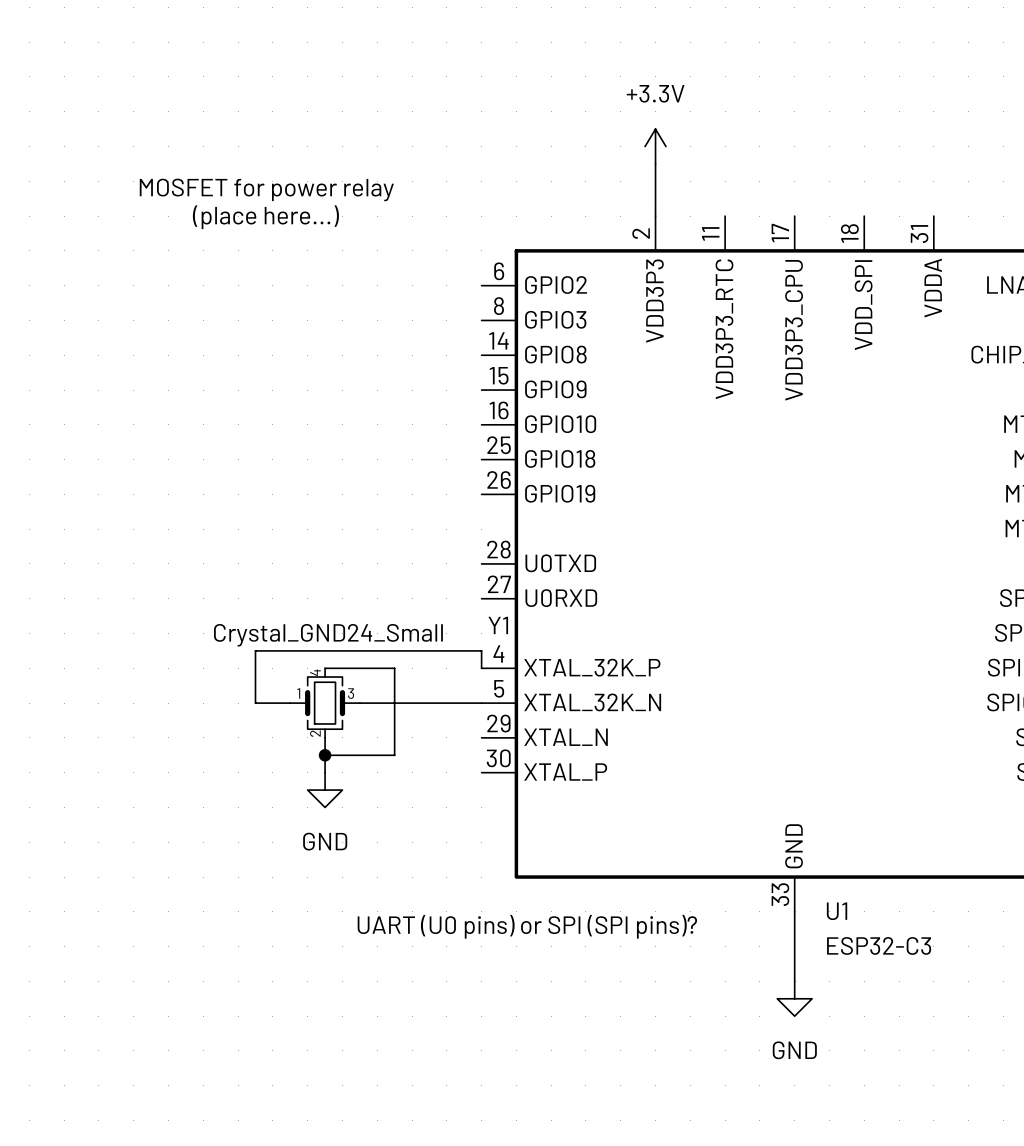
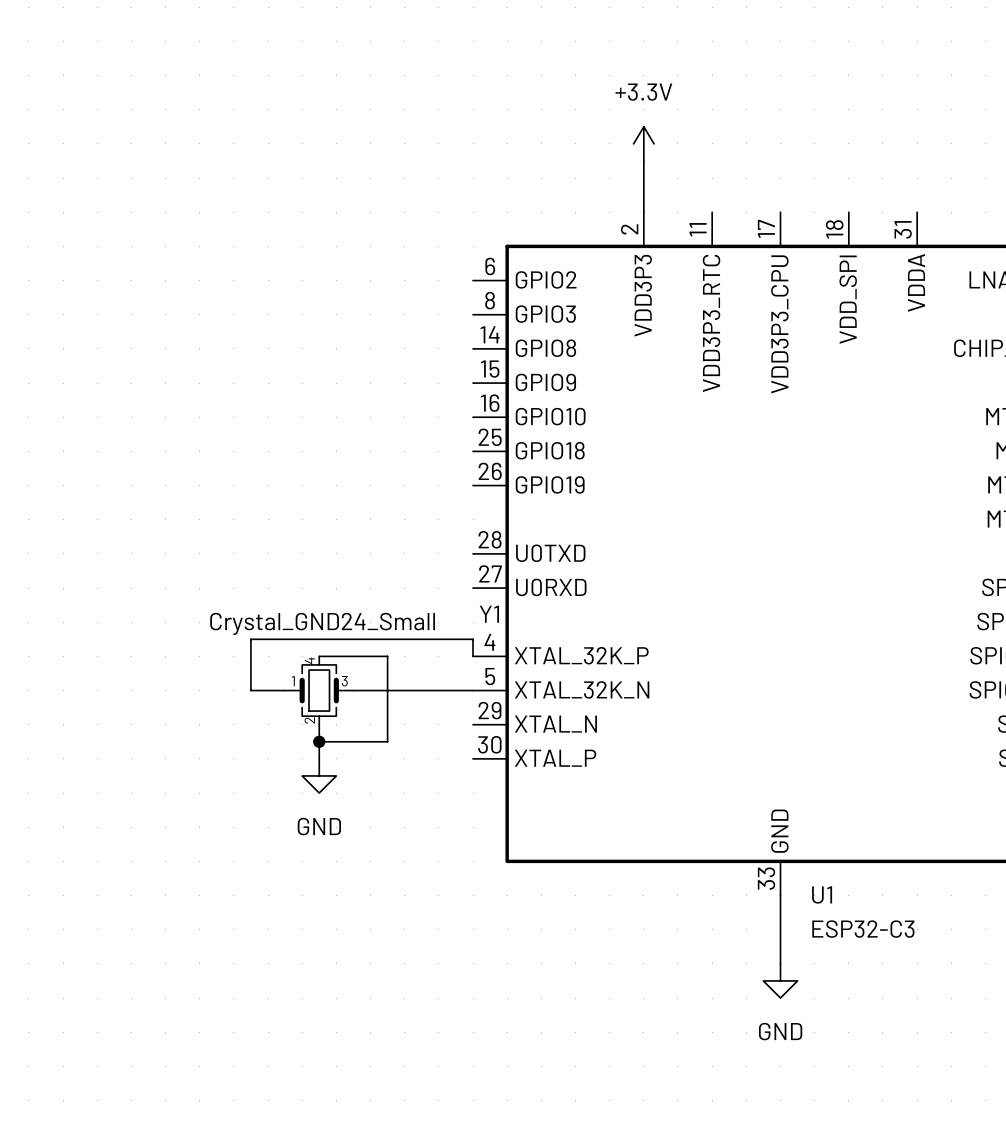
text: MOSFET for power relay (266, 189) -> none
text: (place here...) (265, 217) -> none
text: UART (U0 pins) or SPI (SPI pins)? (527, 926) -> none

